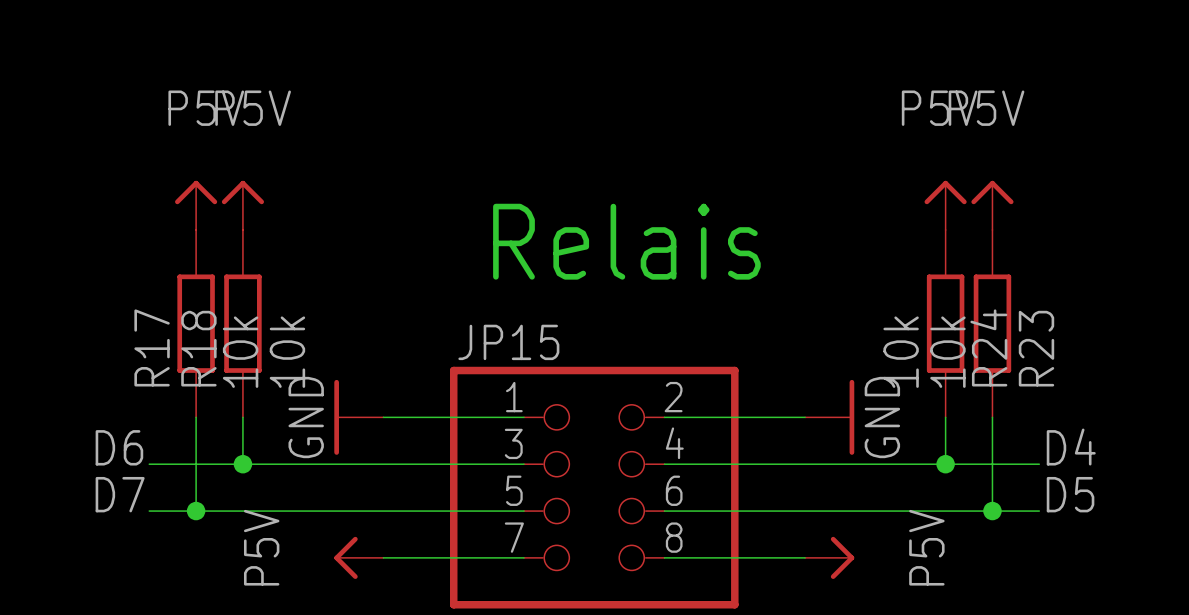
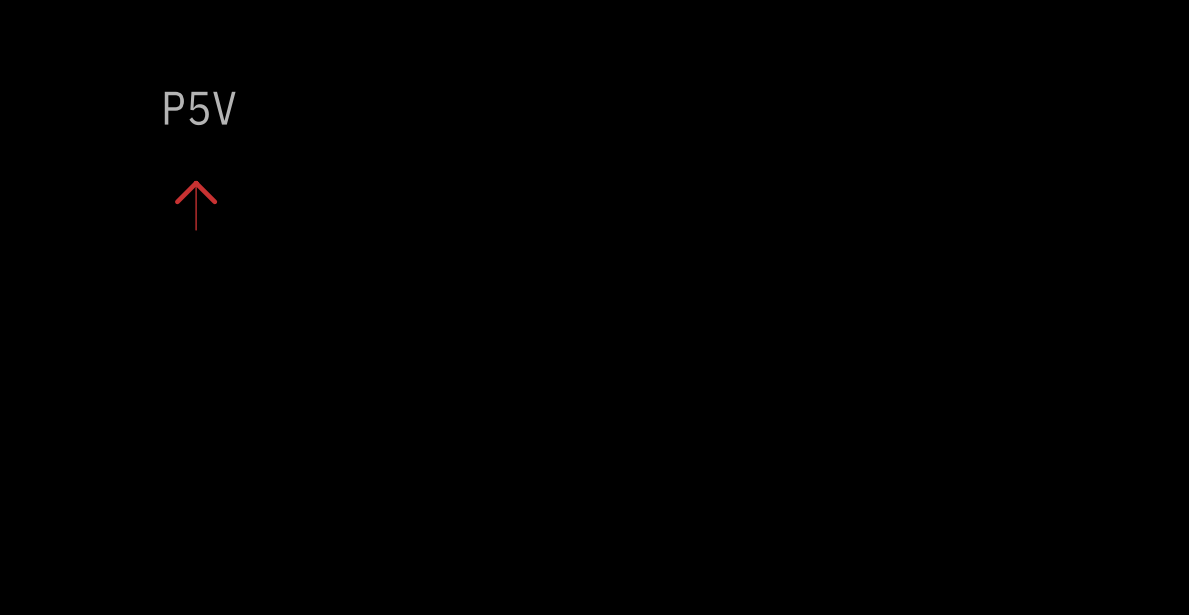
power symbol: P5V (242, 205) -> none
power symbol: P5V (945, 205) -> none
power symbol: P5V (992, 205) -> none
text: Relais (626, 241) -> none
R17: 10k (196, 323) -> none
R18: 10k (242, 323) -> none
R24: 10k (945, 323) -> none
R23: 10k (992, 323) -> none
wire: (196, 417) (196, 511) -> none
wire: (242, 417) (242, 464) -> none
power symbol: GND (358, 417) -> none
wire: (383, 417) (524, 417) -> none
wire: (664, 417) (805, 417) -> none
power symbol: GND (829, 417) -> none
wire: (945, 417) (945, 464) -> none
wire: (992, 417) (992, 511) -> none
label: D6 (119, 447) -> none
label: D4 (1071, 447) -> none
wire: (149, 464) (524, 464) -> none
junction: (242, 464) -> none
wire: (664, 464) (1039, 464) -> none
junction: (945, 464) -> none
JP15: (594, 487) -> none
label: D7 (120, 494) -> none
label: D5 (1070, 494) -> none
wire: (149, 511) (524, 511) -> none
junction: (196, 511) -> none
wire: (664, 511) (1039, 511) -> none
junction: (992, 511) -> none
power symbol: P5V (358, 557) -> none
wire: (383, 557) (524, 557) -> none
wire: (664, 557) (805, 557) -> none
power symbol: P5V (829, 557) -> none

